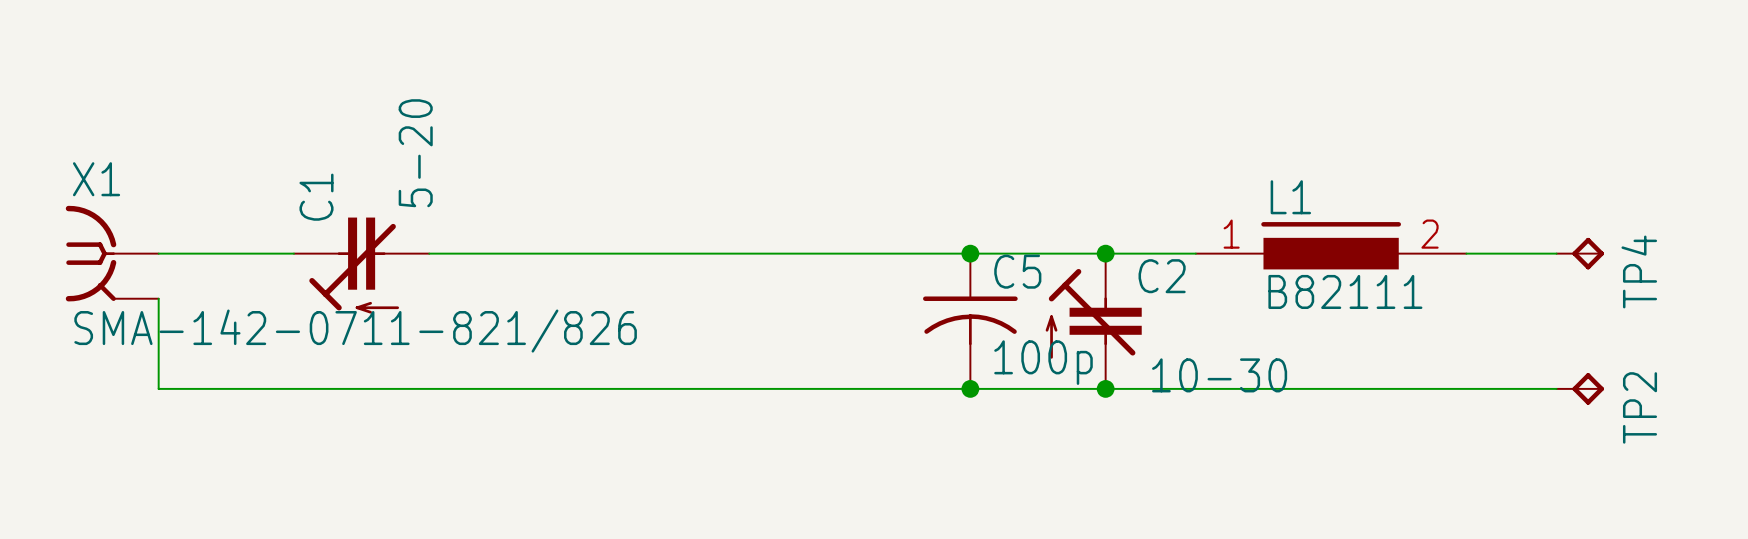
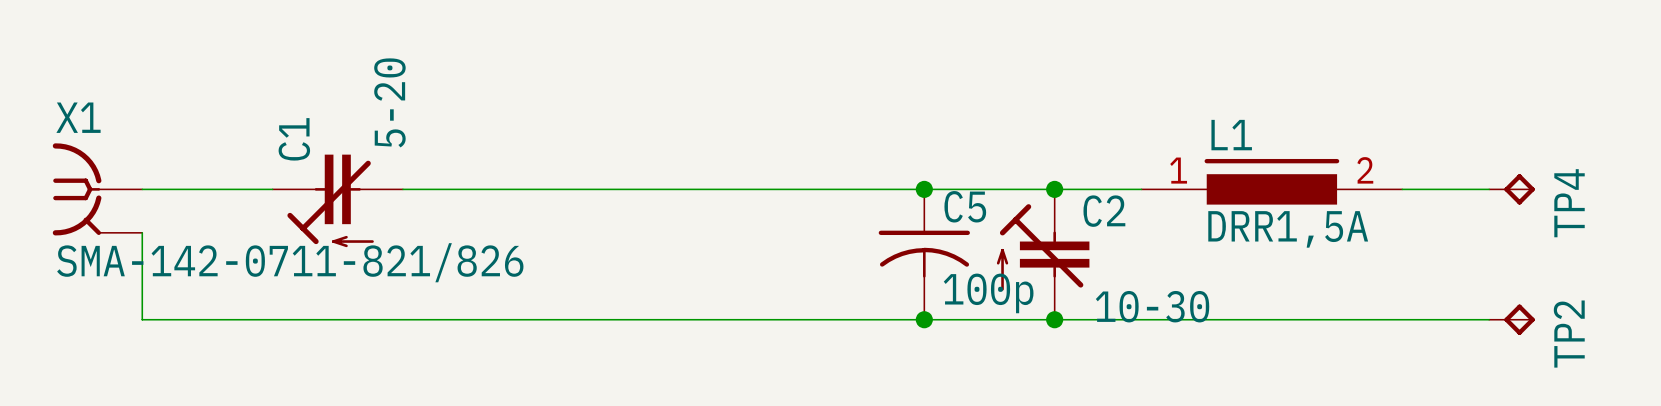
L1 value: B82111 (1345, 291) -> DRR1,5A (1288, 229)

